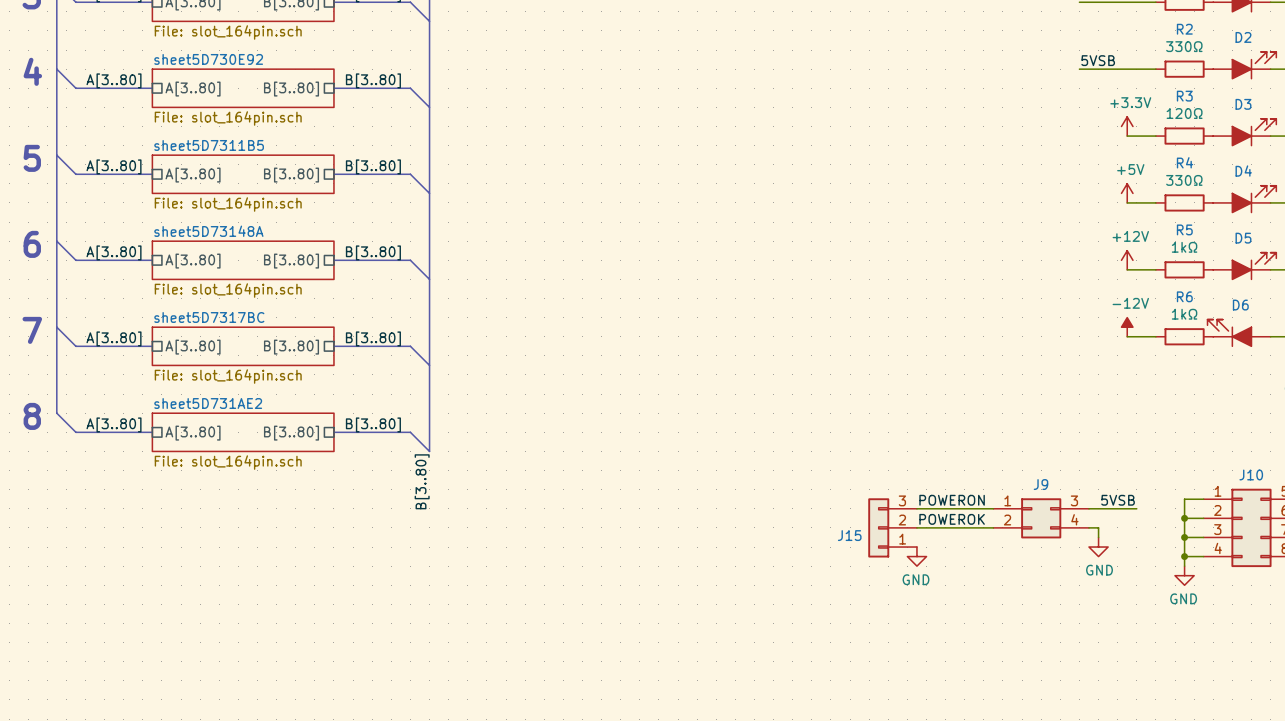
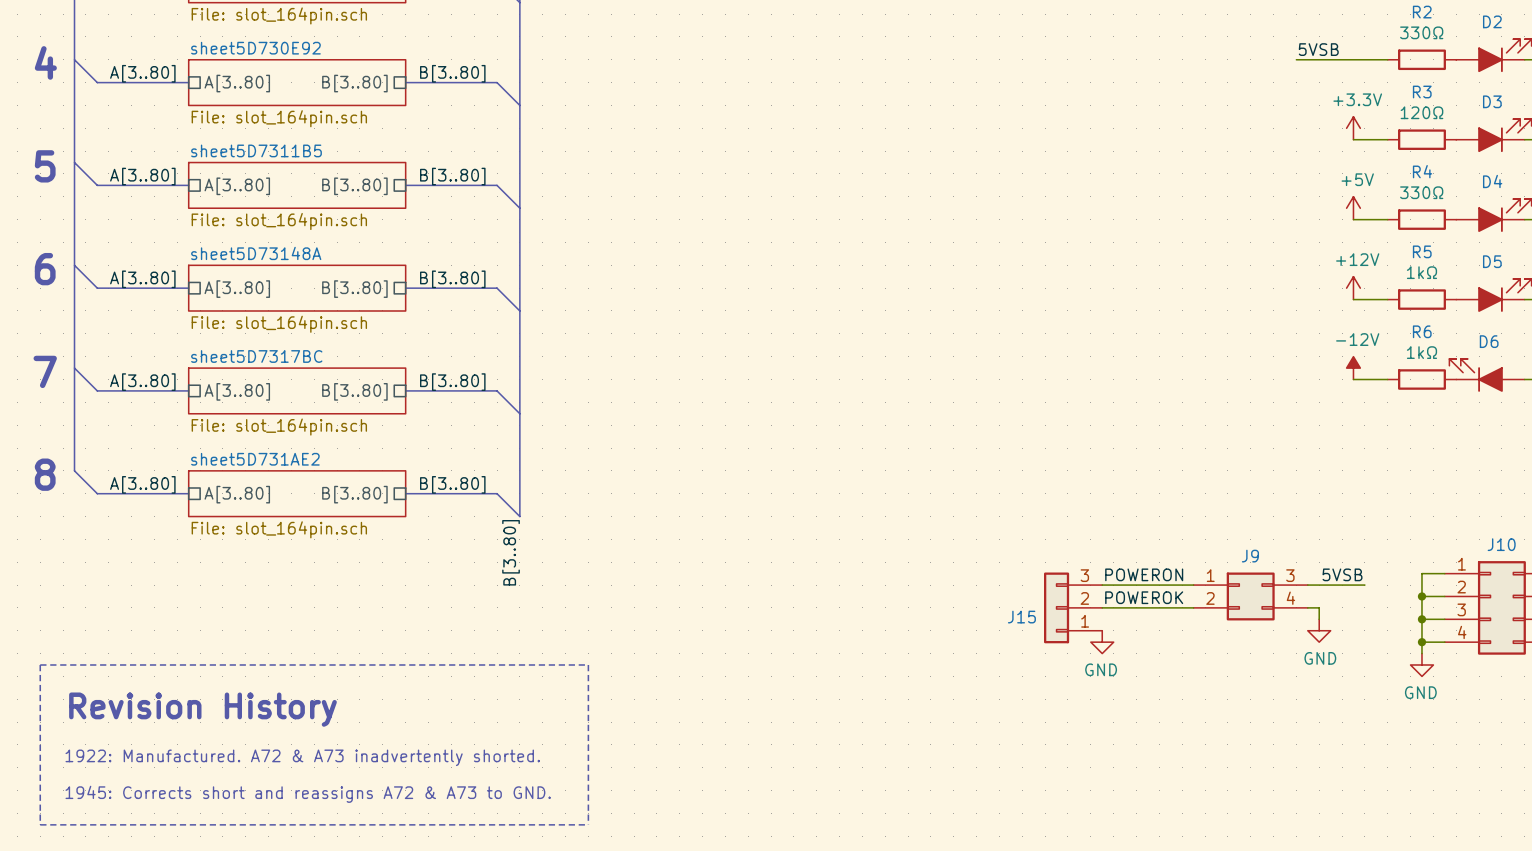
line: none -> (40, 664) (588, 664) (588, 824) (40, 824) (40, 664)
text: none -> Revision History (202, 709)
text: none -> 1922: Manufactured. A72 & A73 inadvertently shorted. (302, 757)
text: none -> 1945: Corrects short and reassigns A72 & A73 to GND. (308, 794)

